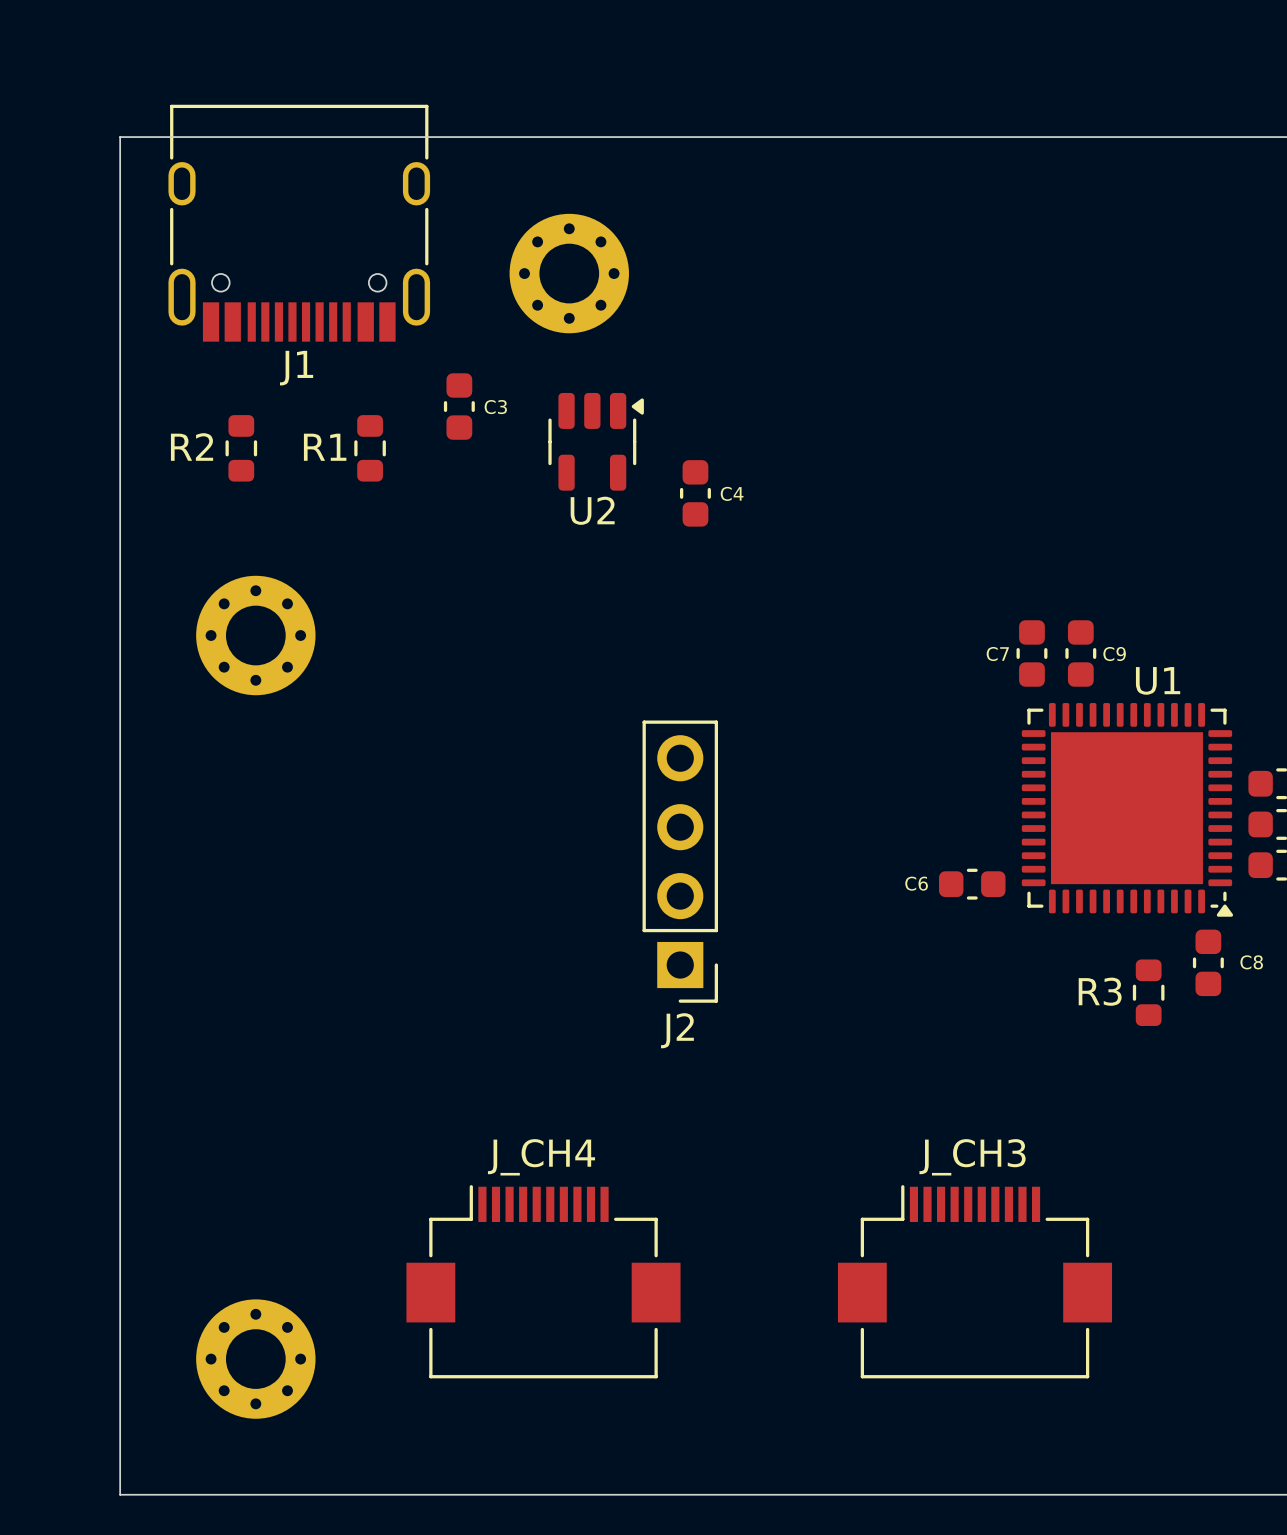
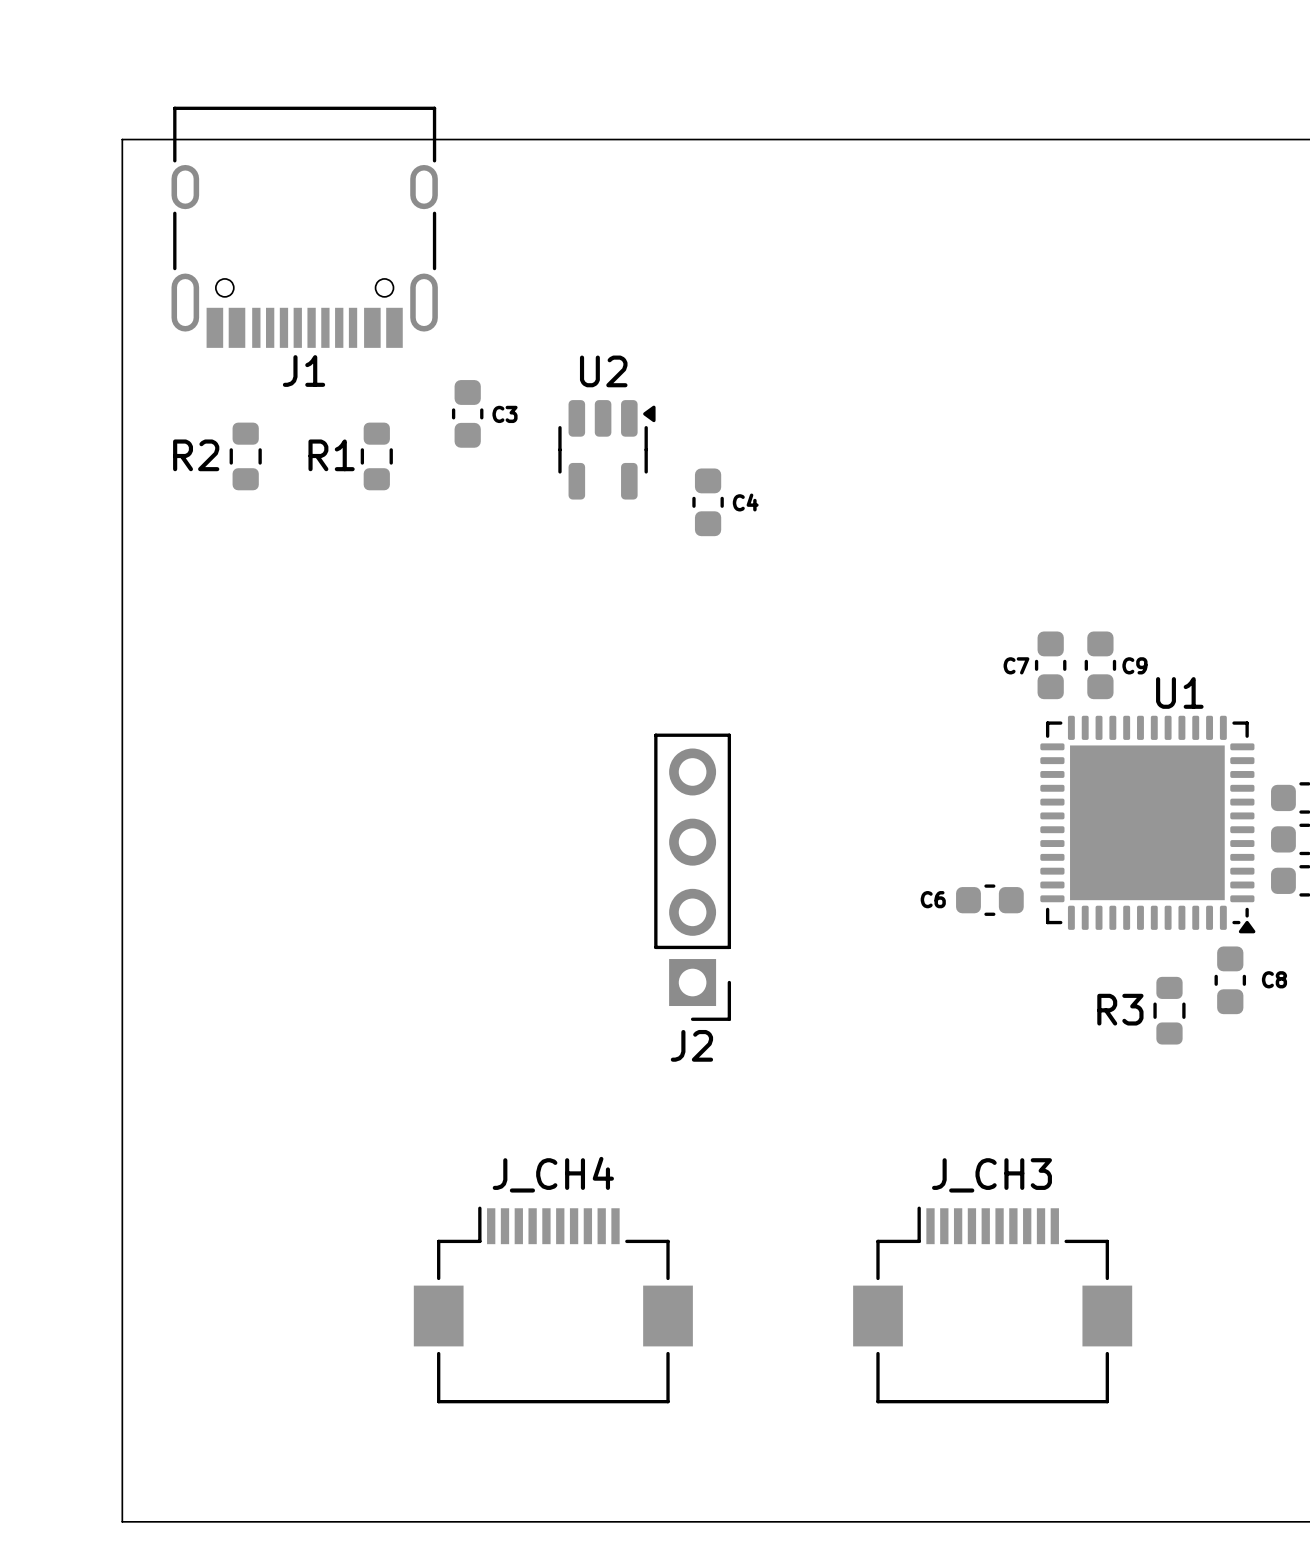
part: (569, 273) -> none
U2 name position: U2 (592, 510) -> U2 (603, 371)
part: (255, 635) -> none
part: (255, 1359) -> none

